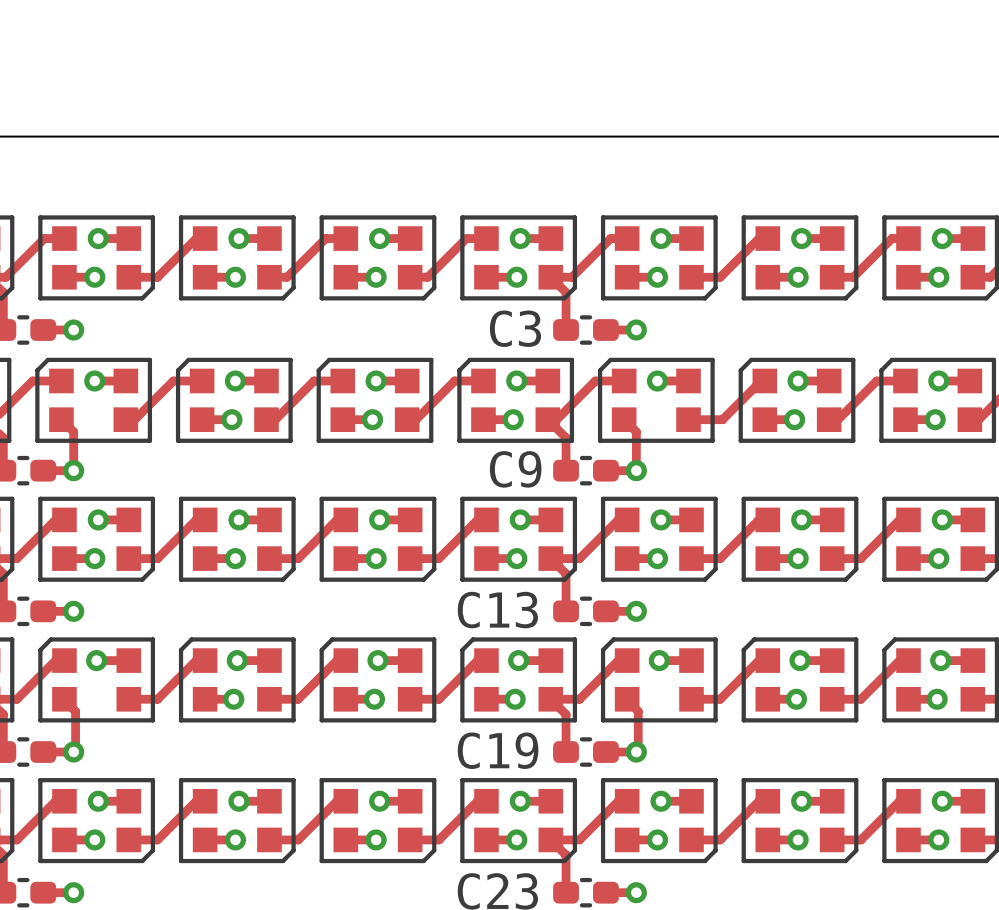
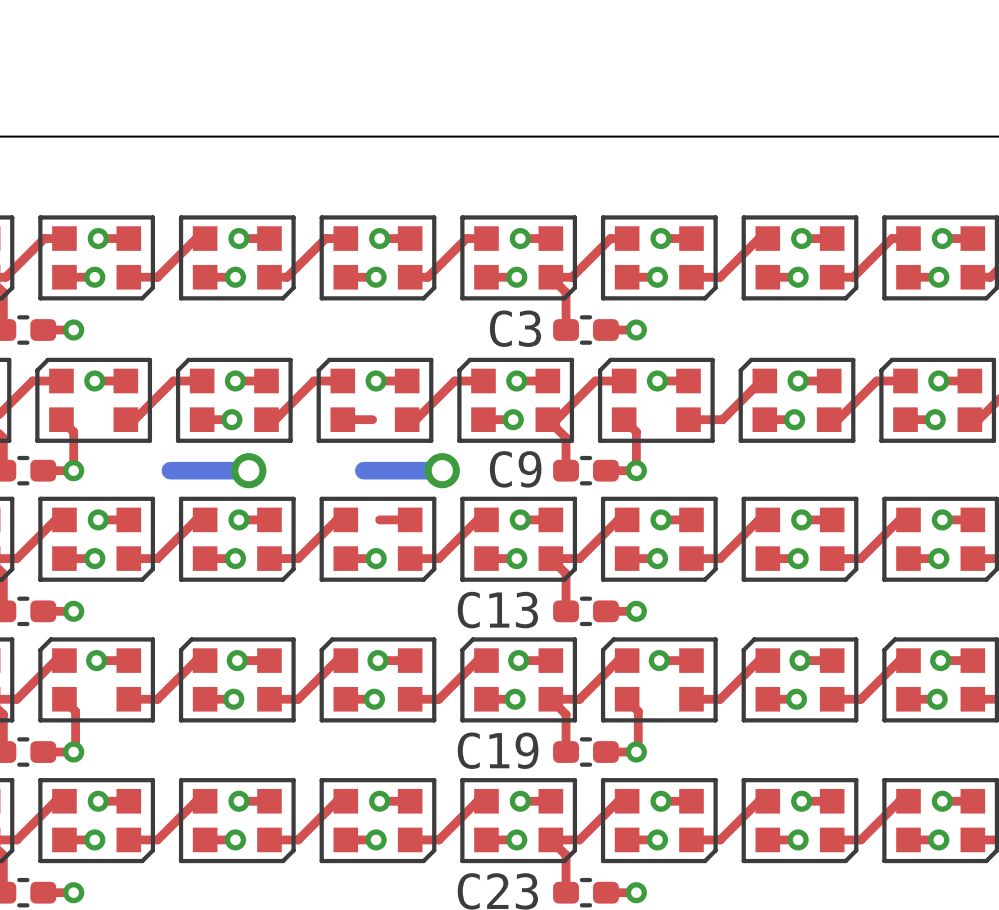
via: (372, 419) -> none
bottom track: none -> (170, 470) (248, 470)
via: none -> (248, 470)
bottom track: none -> (363, 470) (442, 470)
via: none -> (442, 470)
via: (379, 519) -> none

